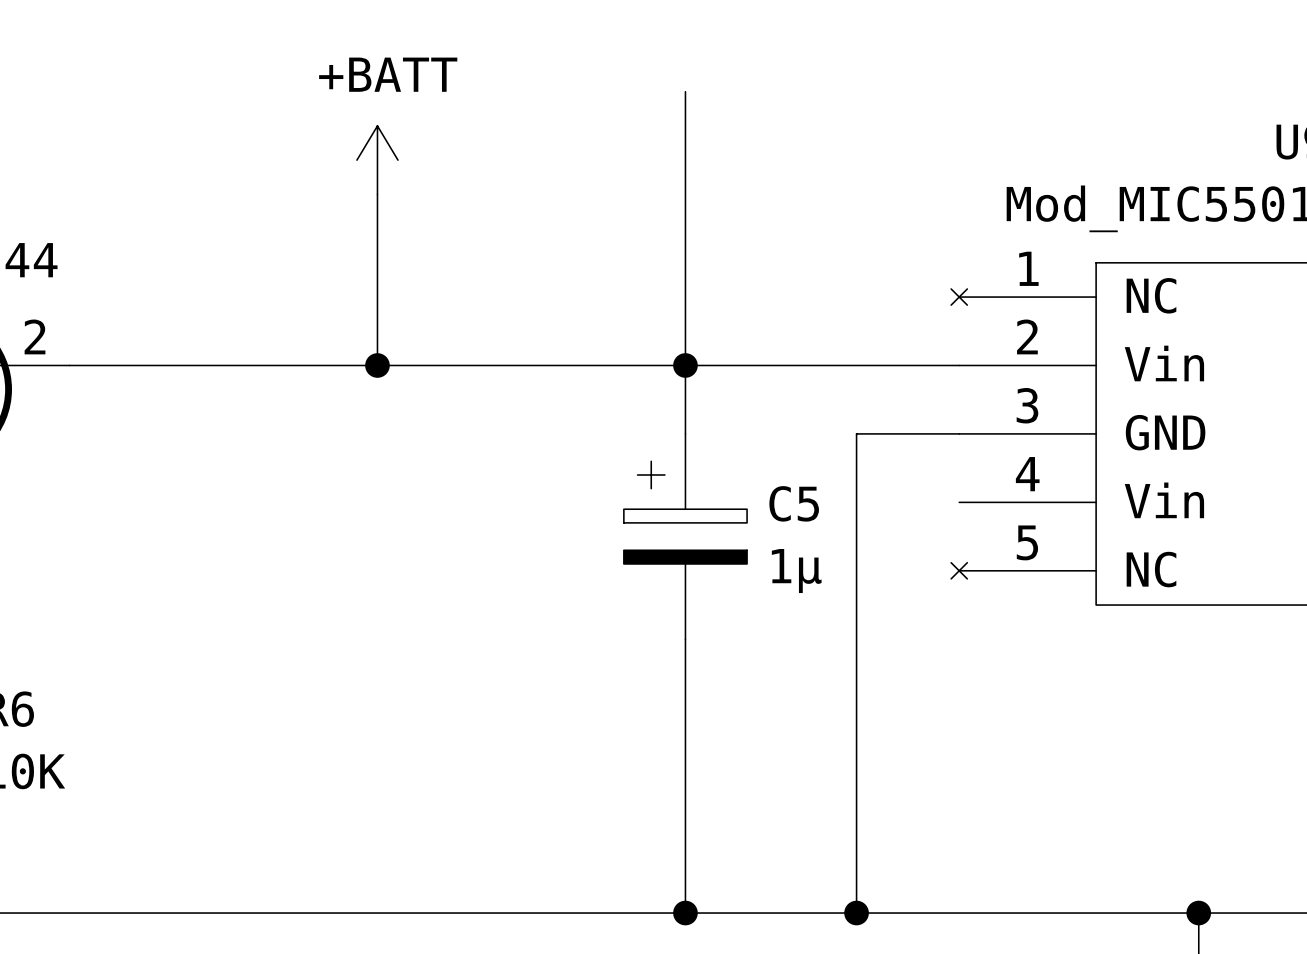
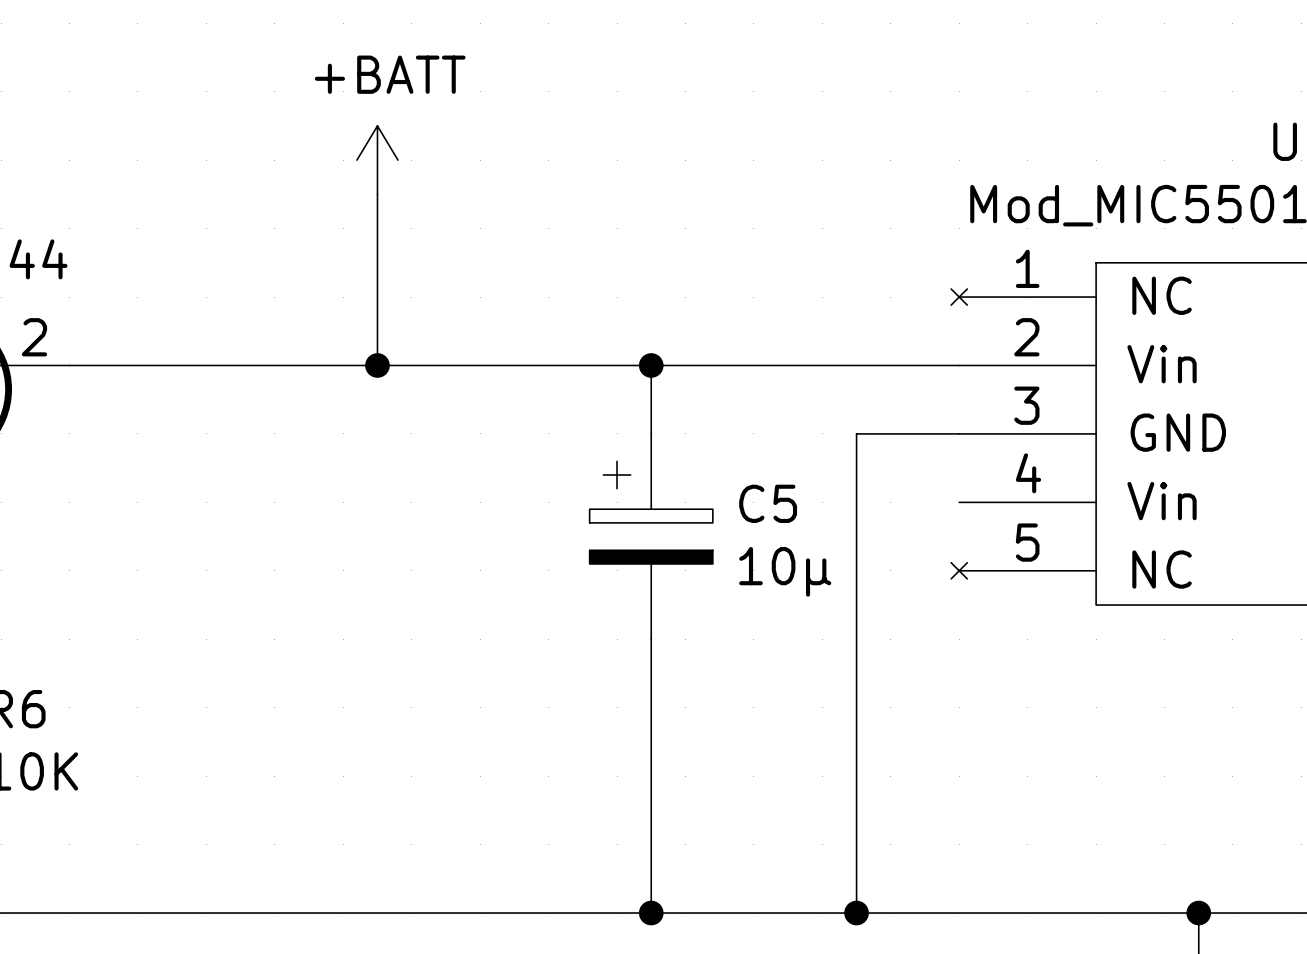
wire: (685, 91) (685, 433) -> none
wire: none -> (651, 365) (651, 433)
junction position: (685, 365) -> (651, 365)
C5 position: (685, 536) -> (651, 536)
C5 value: 1µ (796, 571) -> 10µ (785, 571)
wire: (685, 639) (685, 913) -> (651, 639) (651, 913)
junction position: (685, 913) -> (651, 913)

